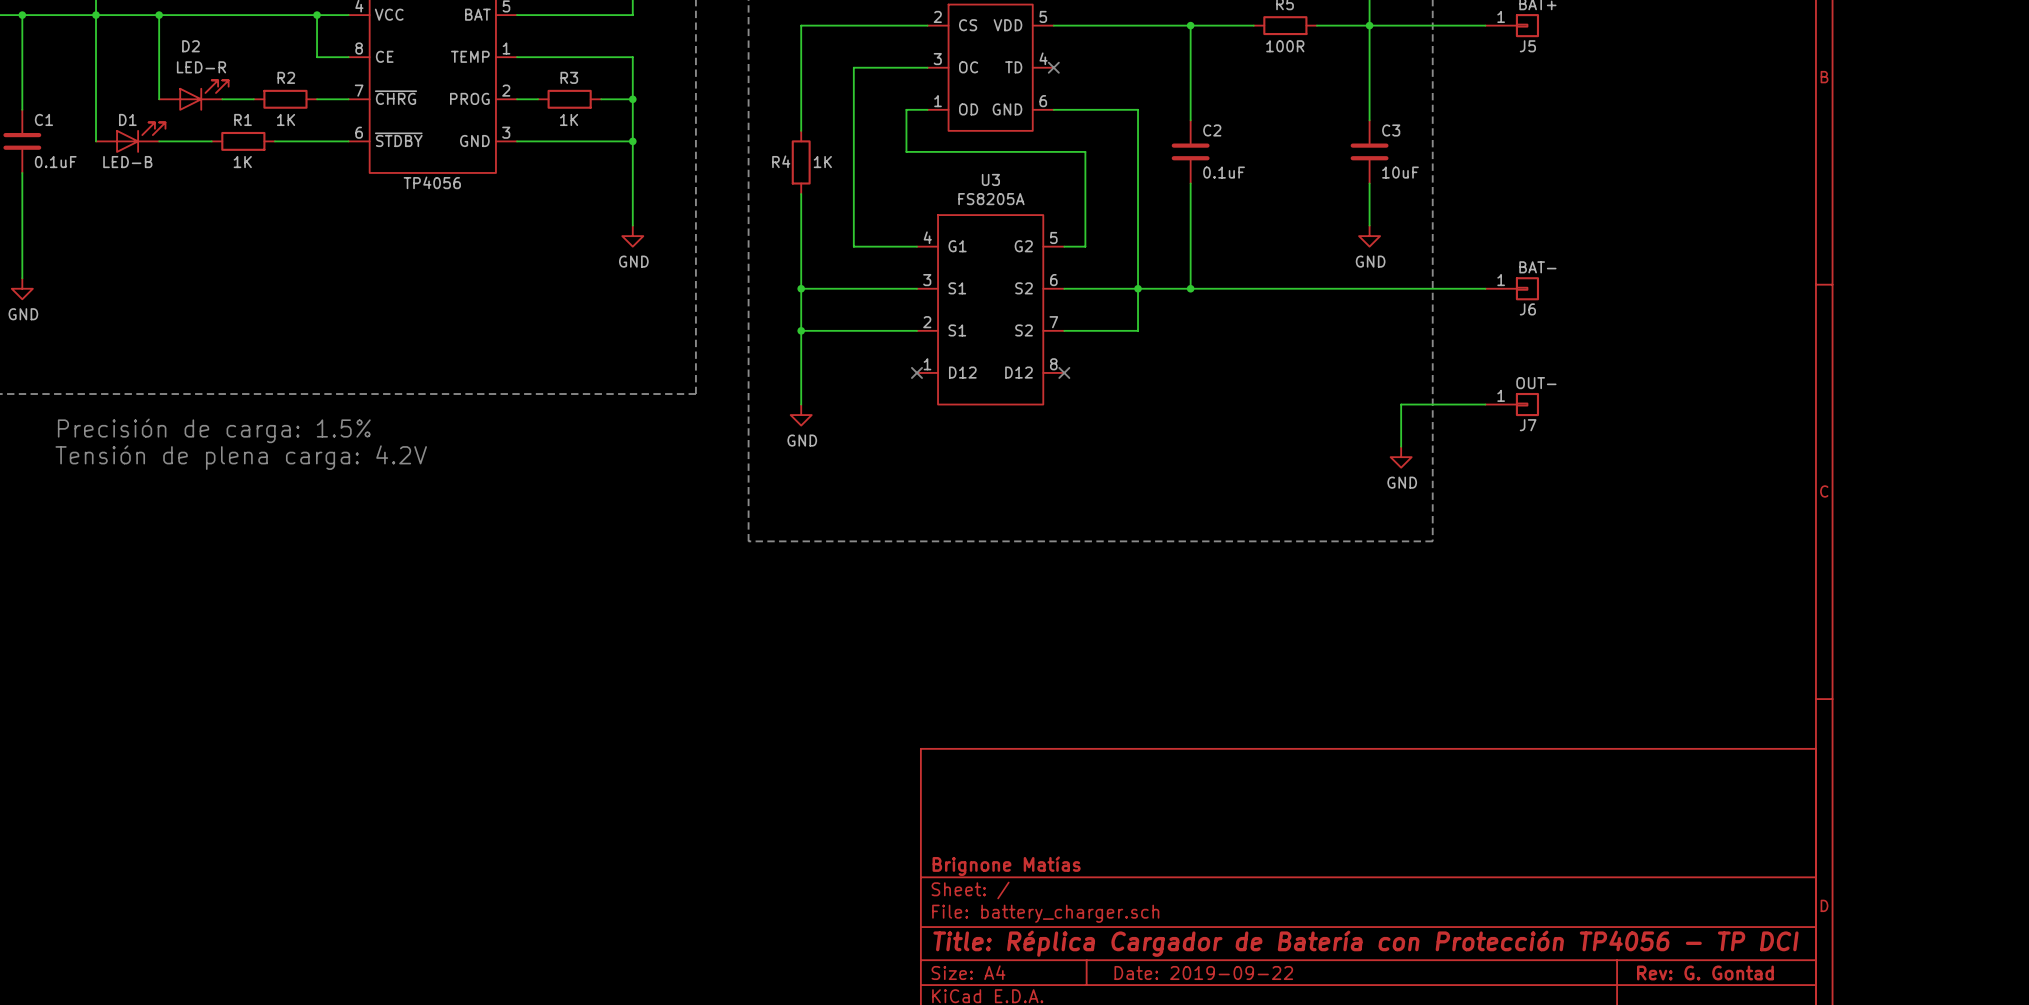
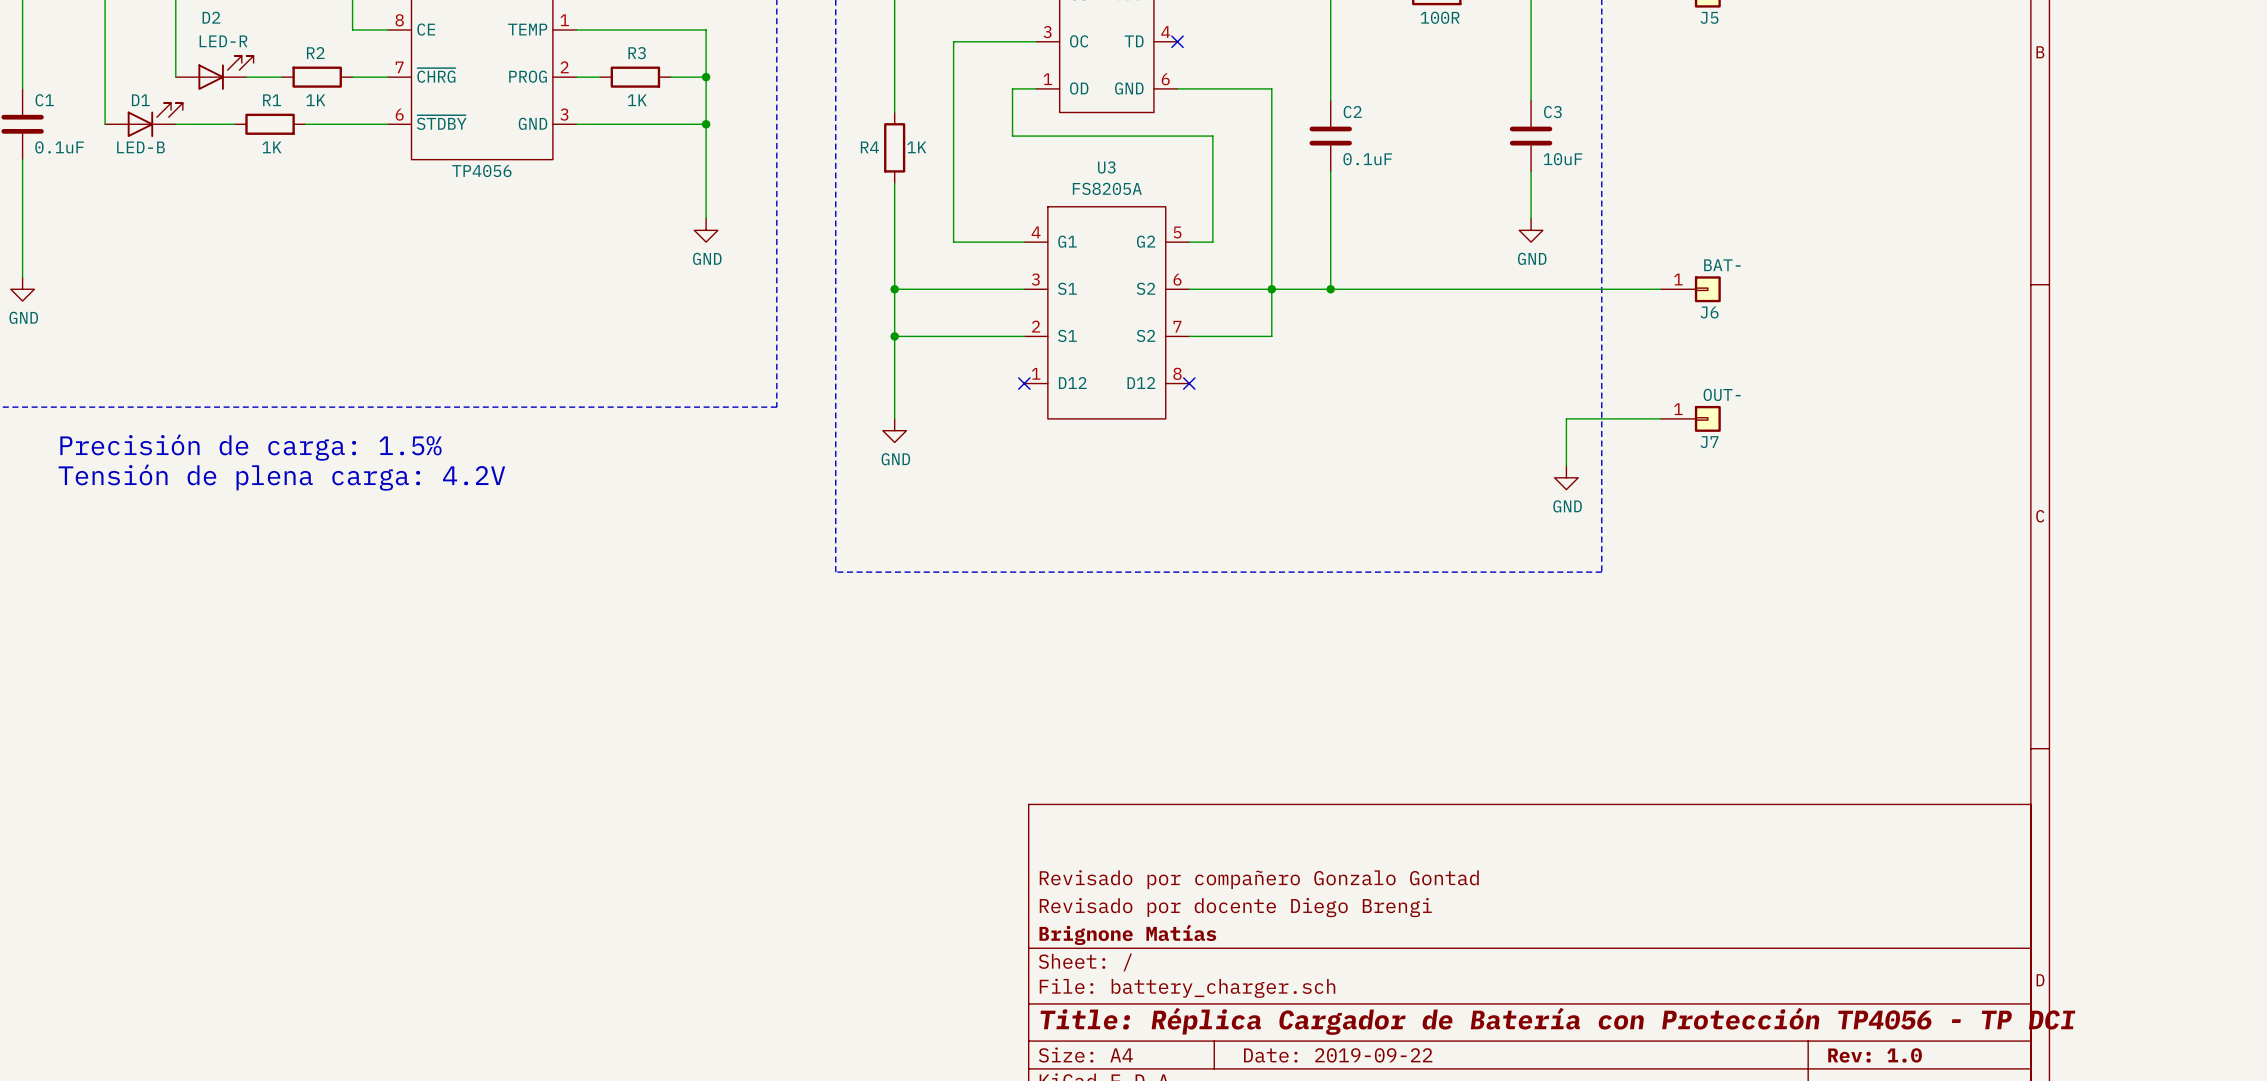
title block: none -> Revisado por compañero Gonzalo Gontad (1259, 879)
title block: none -> Revisado por docente Diego Brengi (1235, 907)
title block: Rev: G. Gontad (1705, 972) -> Rev: 1.0 (1875, 1055)

